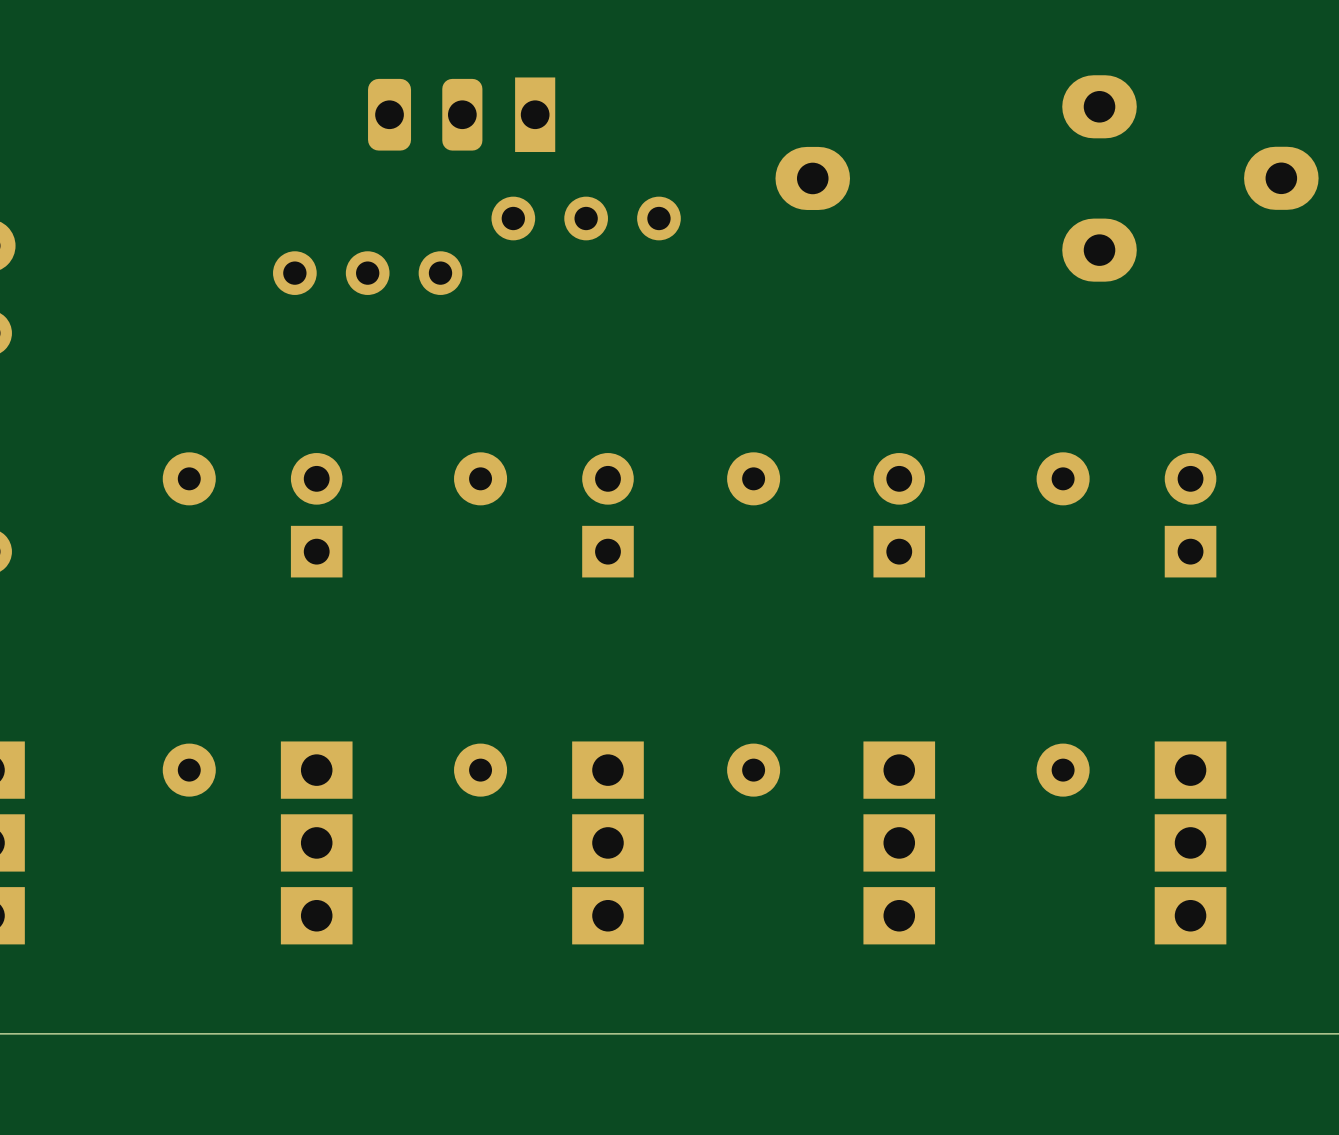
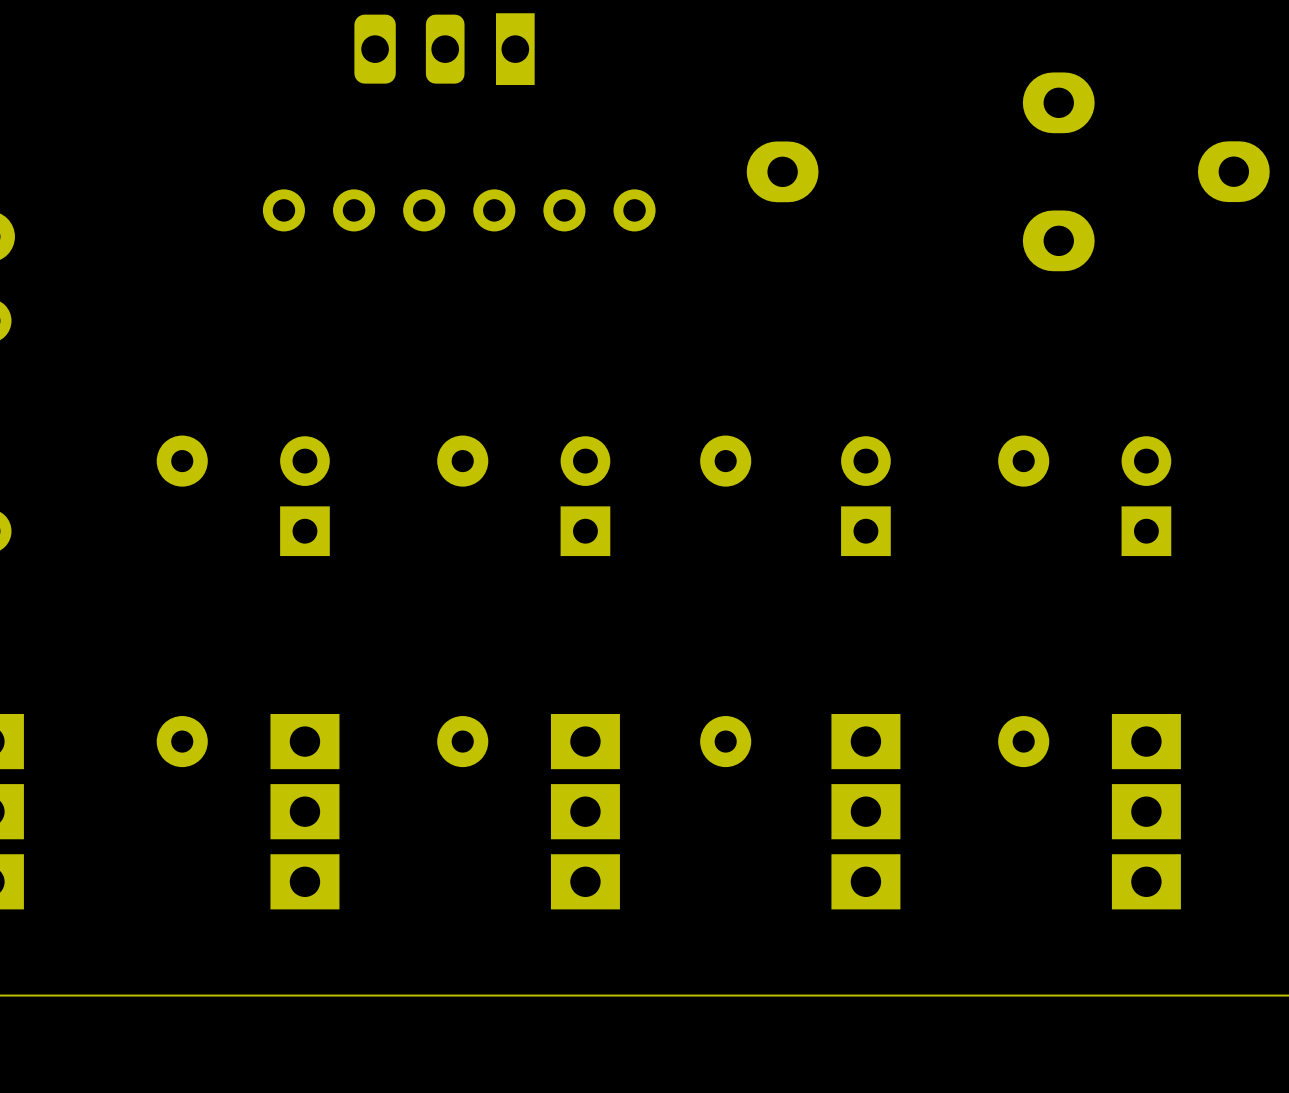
part position: (461, 114) -> (444, 49)
part position: (367, 273) -> (354, 210)

